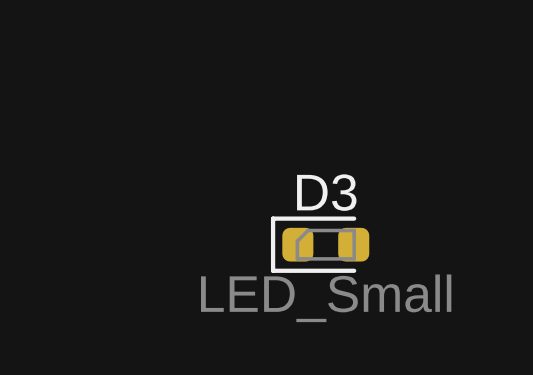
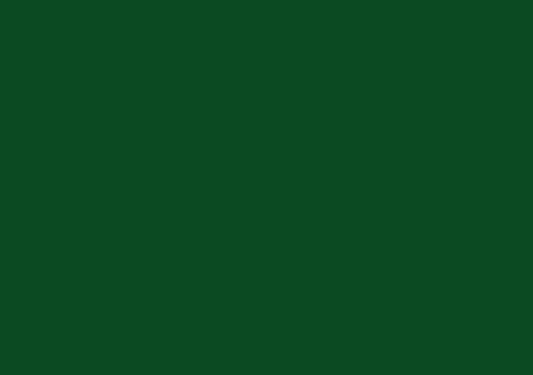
D3: LED_Small (320, 244) -> none

